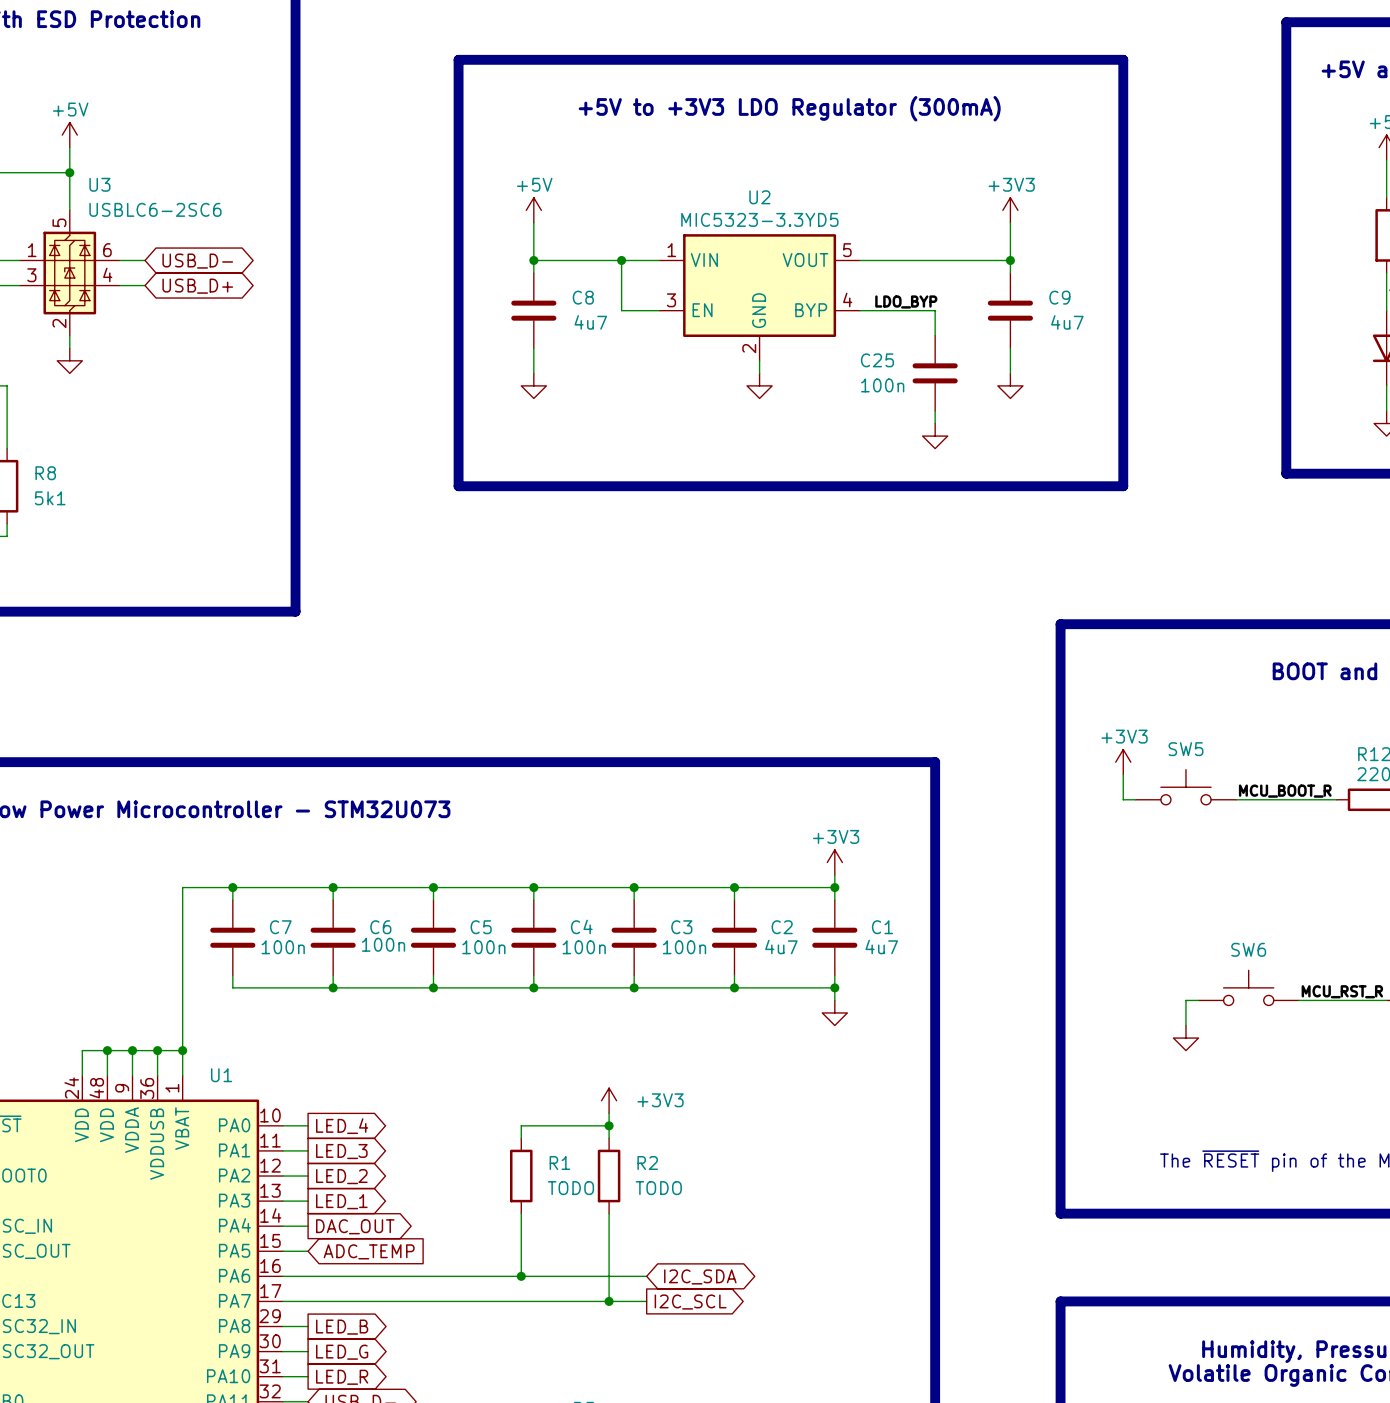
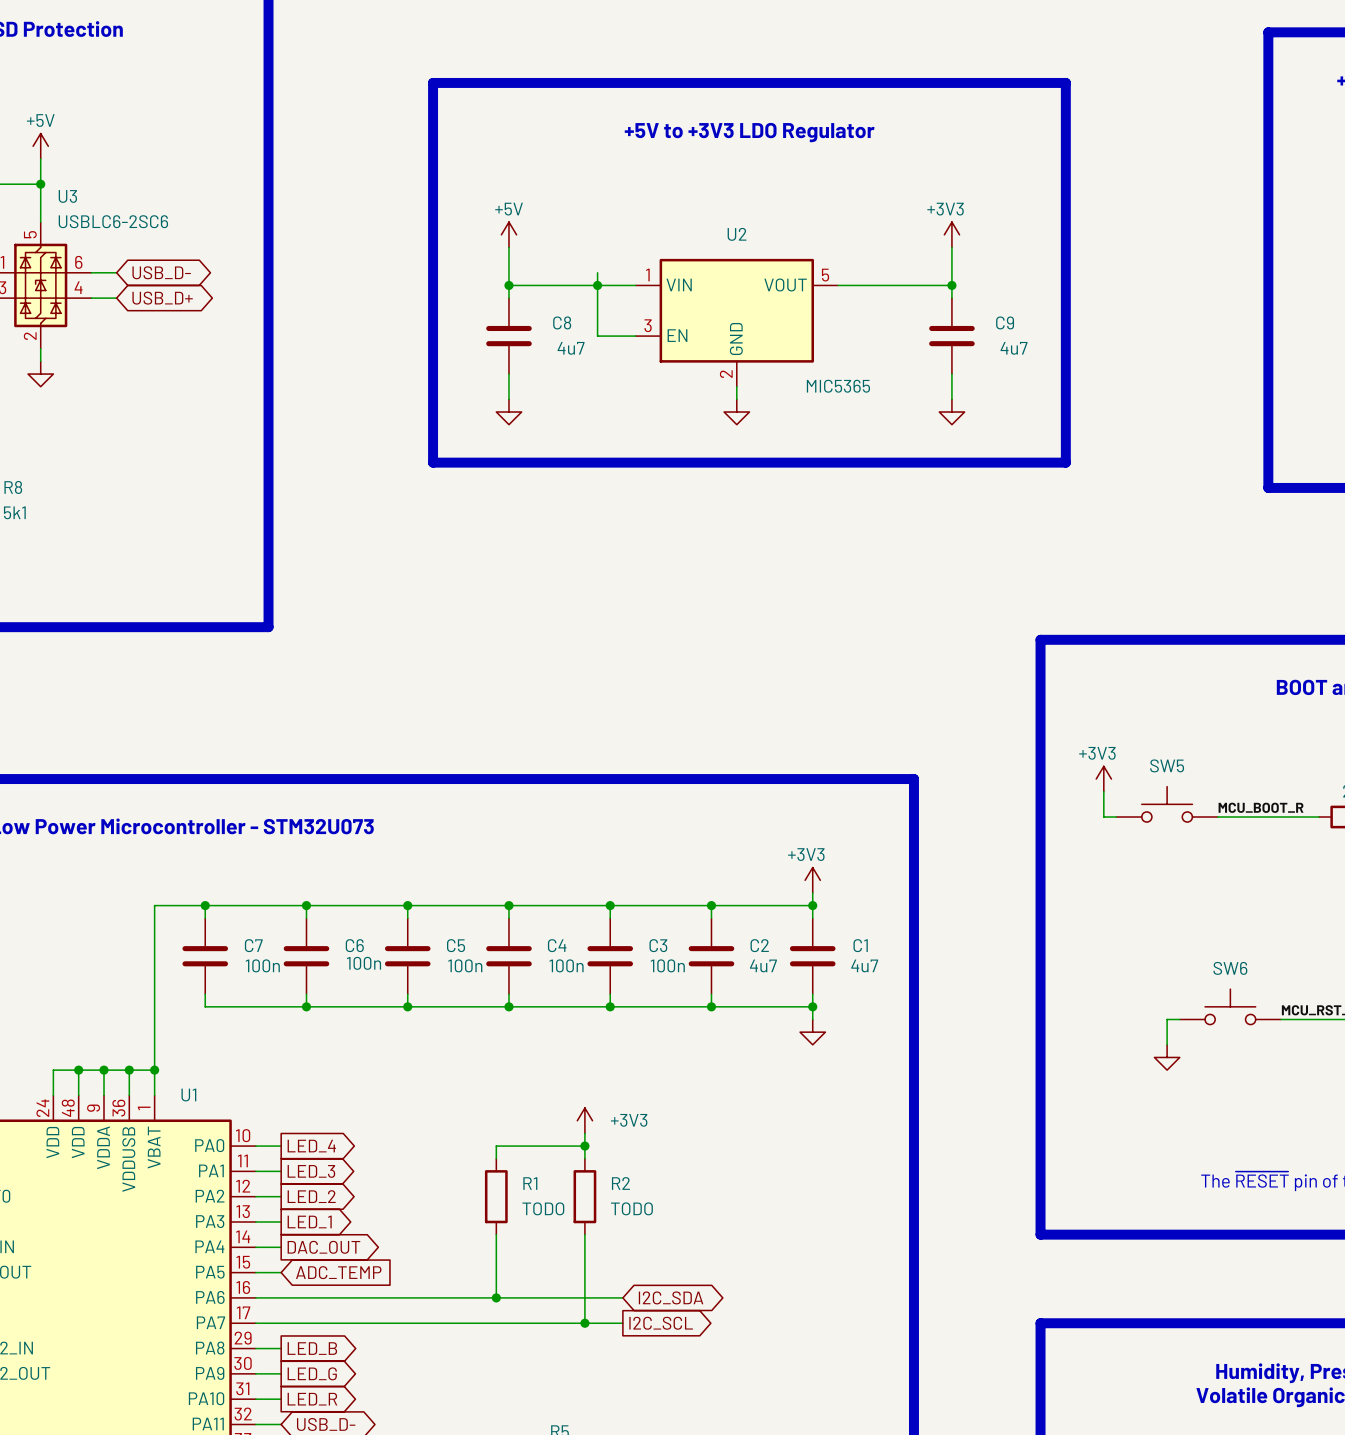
line: (458, 72) (458, 59) (1123, 59) (1123, 486) (458, 486) (458, 448) -> (433, 82) (1065, 82) (1065, 462) (433, 462)
text: +5V to +3V3 LDO Regulator (300mA) (789, 108) -> +5V to +3V3 LDO Regulator (749, 132)
power symbol position: +5V (533, 210) -> +5V (508, 234)
power symbol position: +3V3 (1010, 210) -> +3V3 (951, 234)
U2 value: MIC5323-3.3YD5 (759, 219) -> MIC5365 (838, 386)
wire: (1010, 222) (1010, 273) -> (951, 247) (951, 298)
U2 symbol: [659, 234, 860, 361] -> [635, 258, 839, 387]
wire: (533, 260) (659, 260) -> none
junction position: (533, 260) -> (508, 285)
junction position: (621, 260) -> (597, 285)
wire: (859, 260) (1010, 260) -> none
junction position: (1010, 260) -> (951, 285)
wire: none -> (635, 285) (508, 285) (508, 298)
wire: none -> (838, 285) (951, 285)
label: LDO_BYP (906, 301) -> none
C8 position: (533, 310) -> (508, 336)
wire: (621, 310) (659, 310) -> (597, 323) (597, 336) (635, 336)
wire: (859, 310) (935, 310) (935, 335) -> none
C9 position: (1010, 310) -> (951, 336)
wire: (1010, 348) (1010, 373) -> (951, 374) (951, 399)
C25: 100n (935, 373) -> none
power symbol position: (533, 385) -> (508, 412)
power symbol position: (759, 385) -> (736, 412)
power symbol: (1010, 385) -> none
power symbol: none -> (951, 412)
wire: (935, 410) (935, 423) -> none
power symbol: (935, 436) -> none

